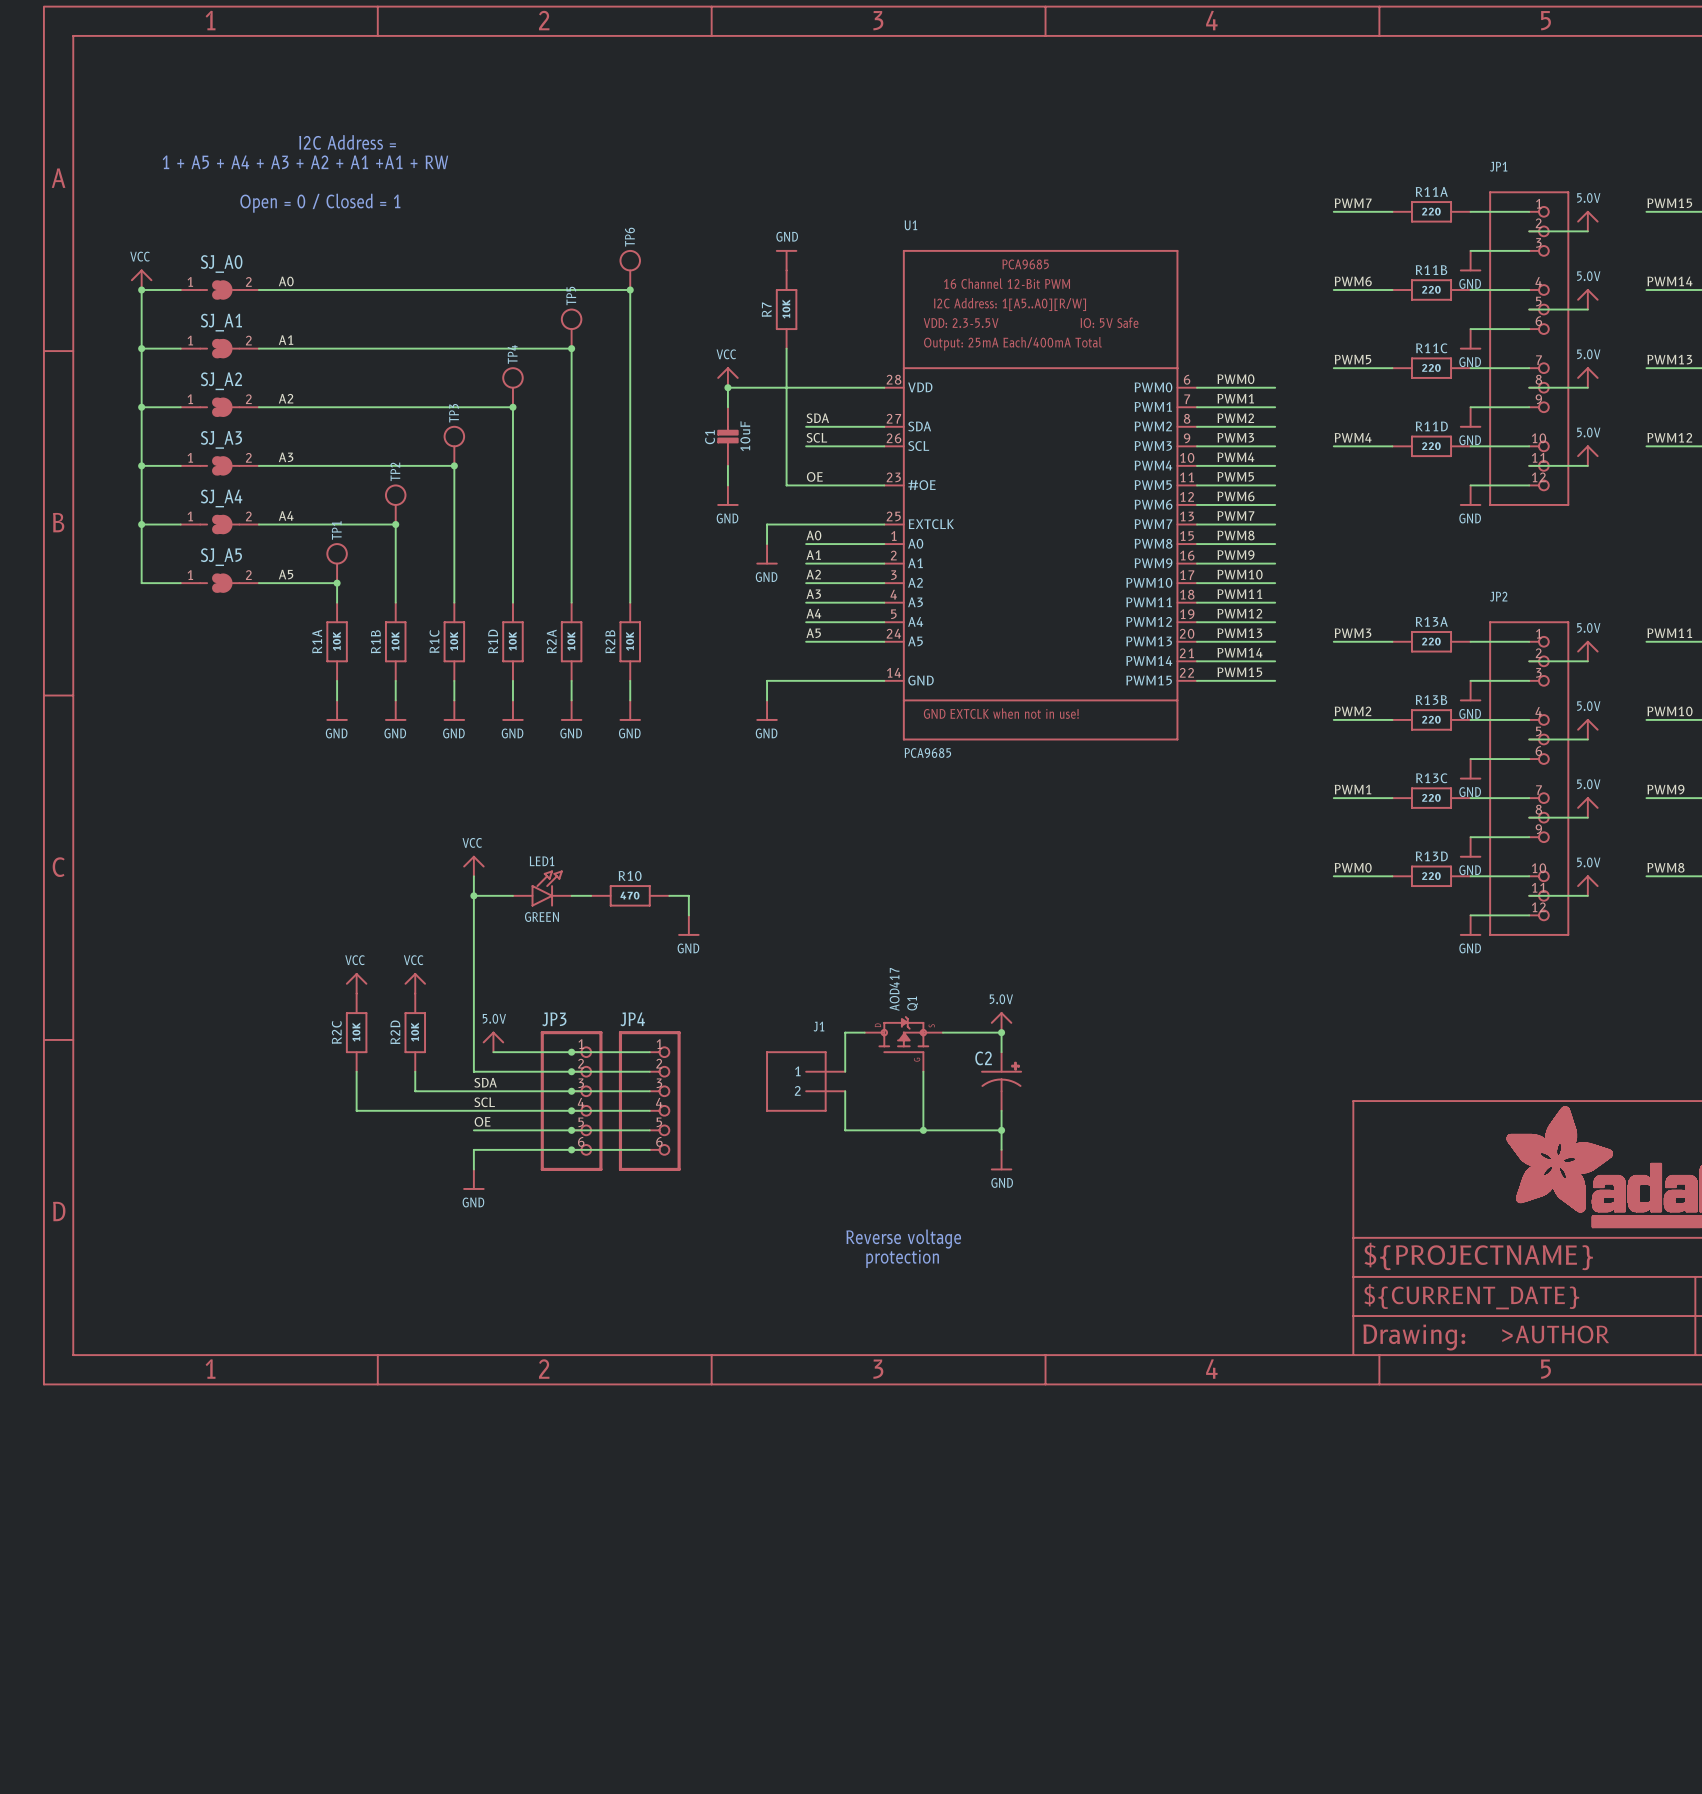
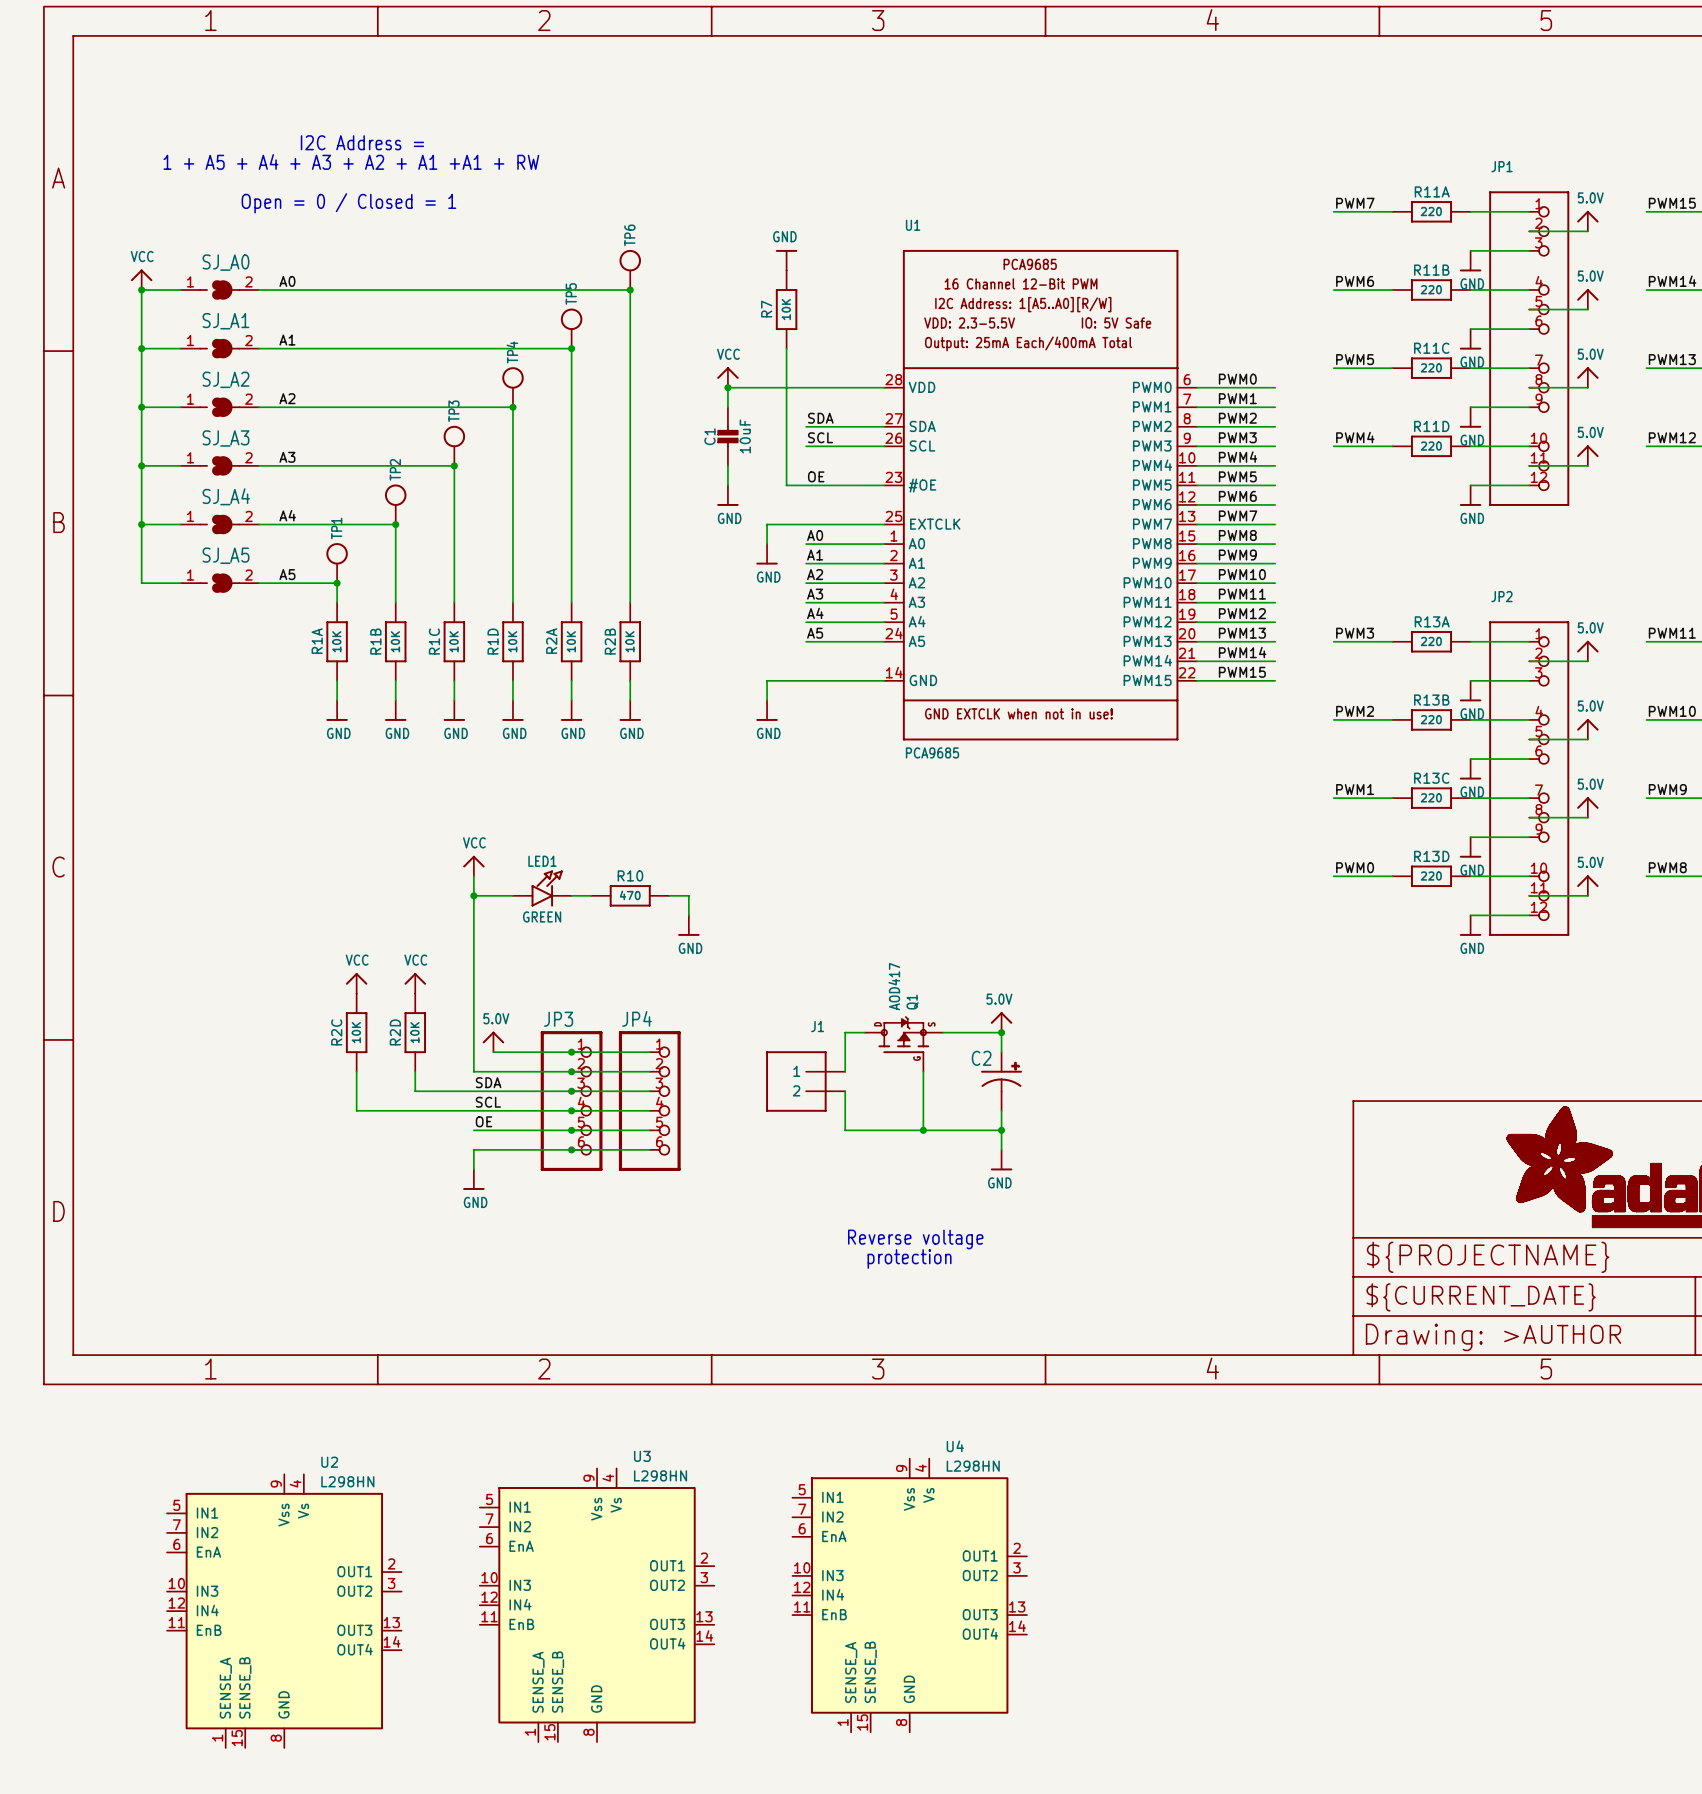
U4: none -> L298HN (909, 1595)
U3: none -> L298HN (597, 1605)
U2: none -> L298HN (284, 1611)

